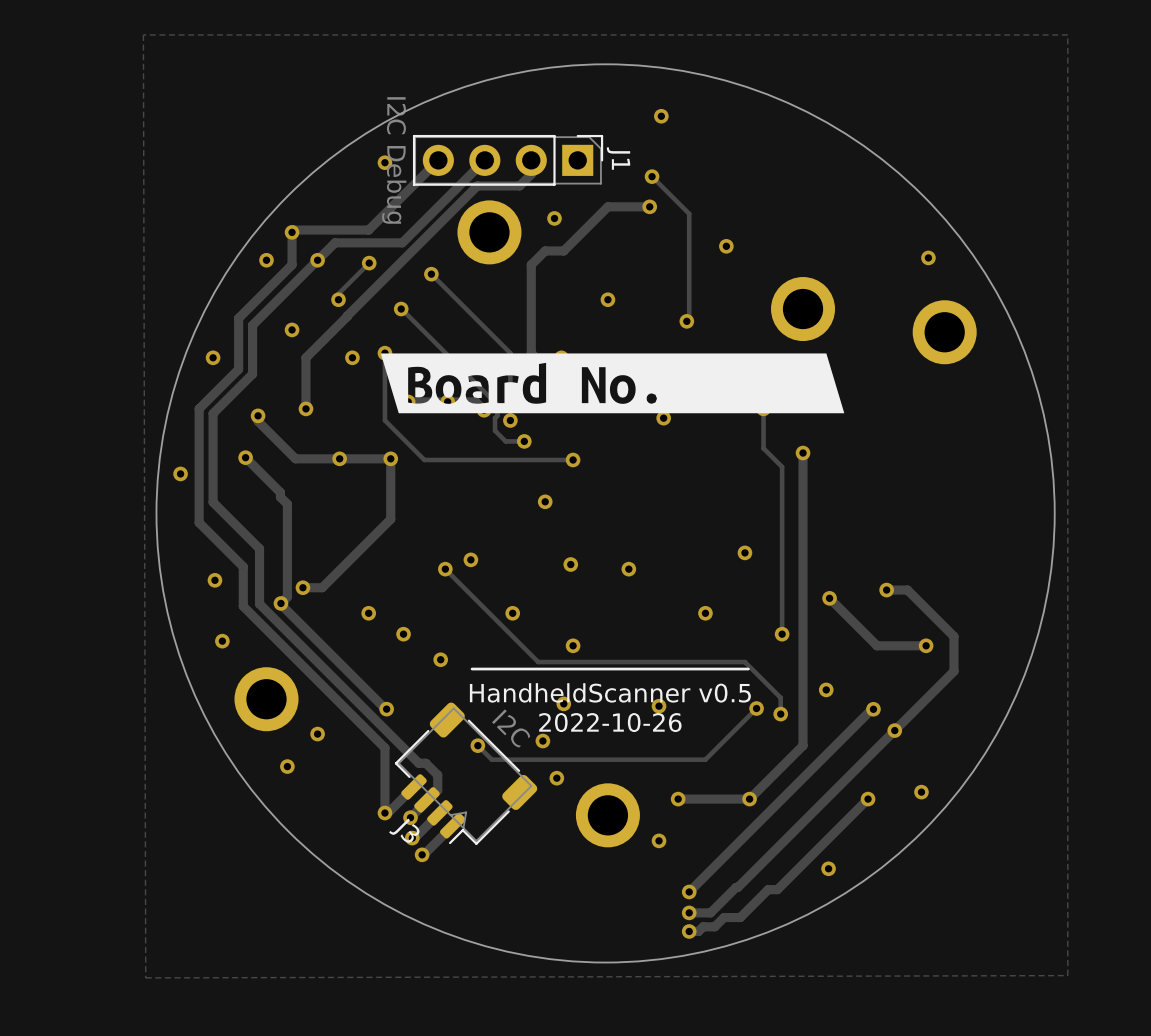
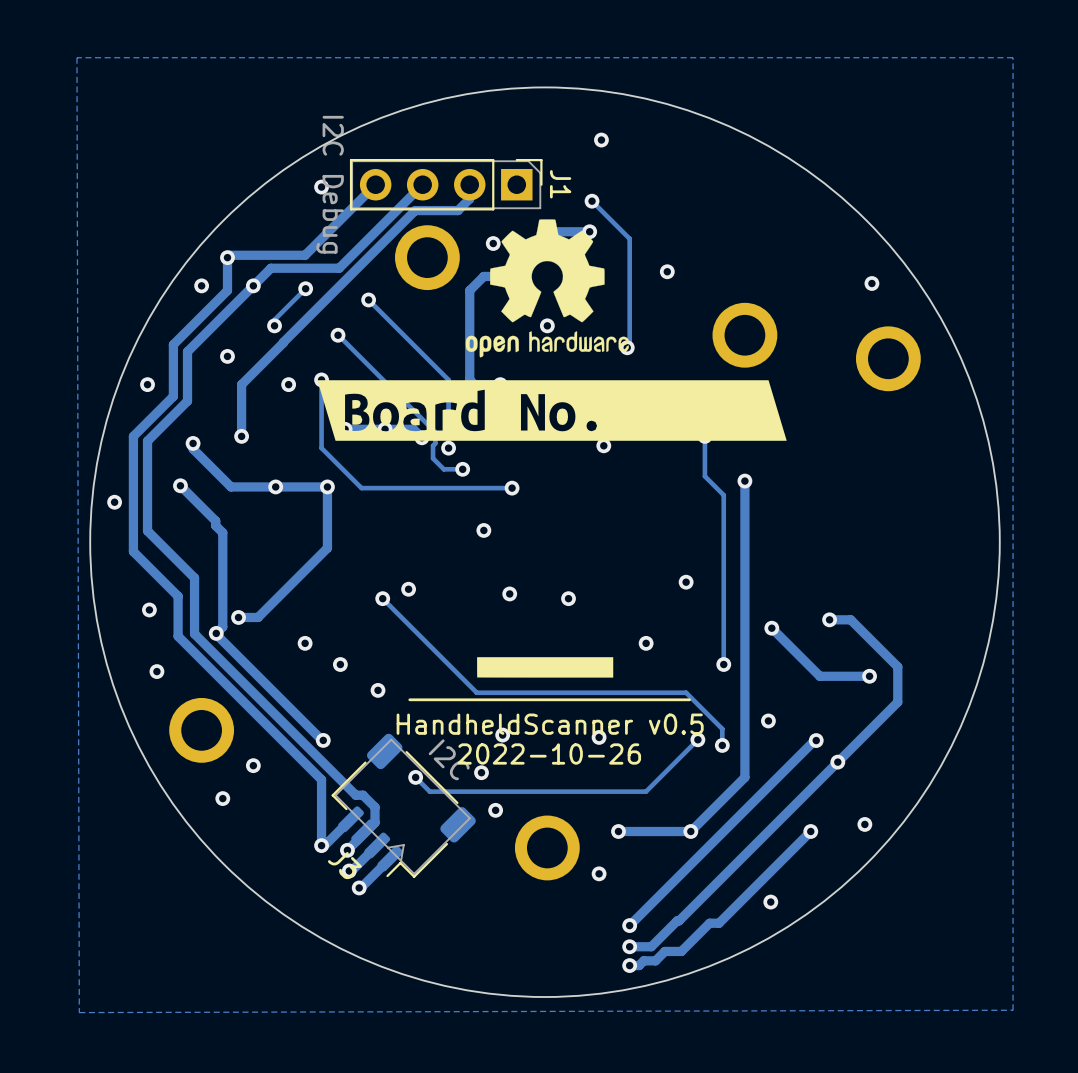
drawing: none -> [465, 219, 629, 358]
via: (512, 613) -> none
drawing: none -> [477, 657, 614, 678]
via: (573, 645) -> none

